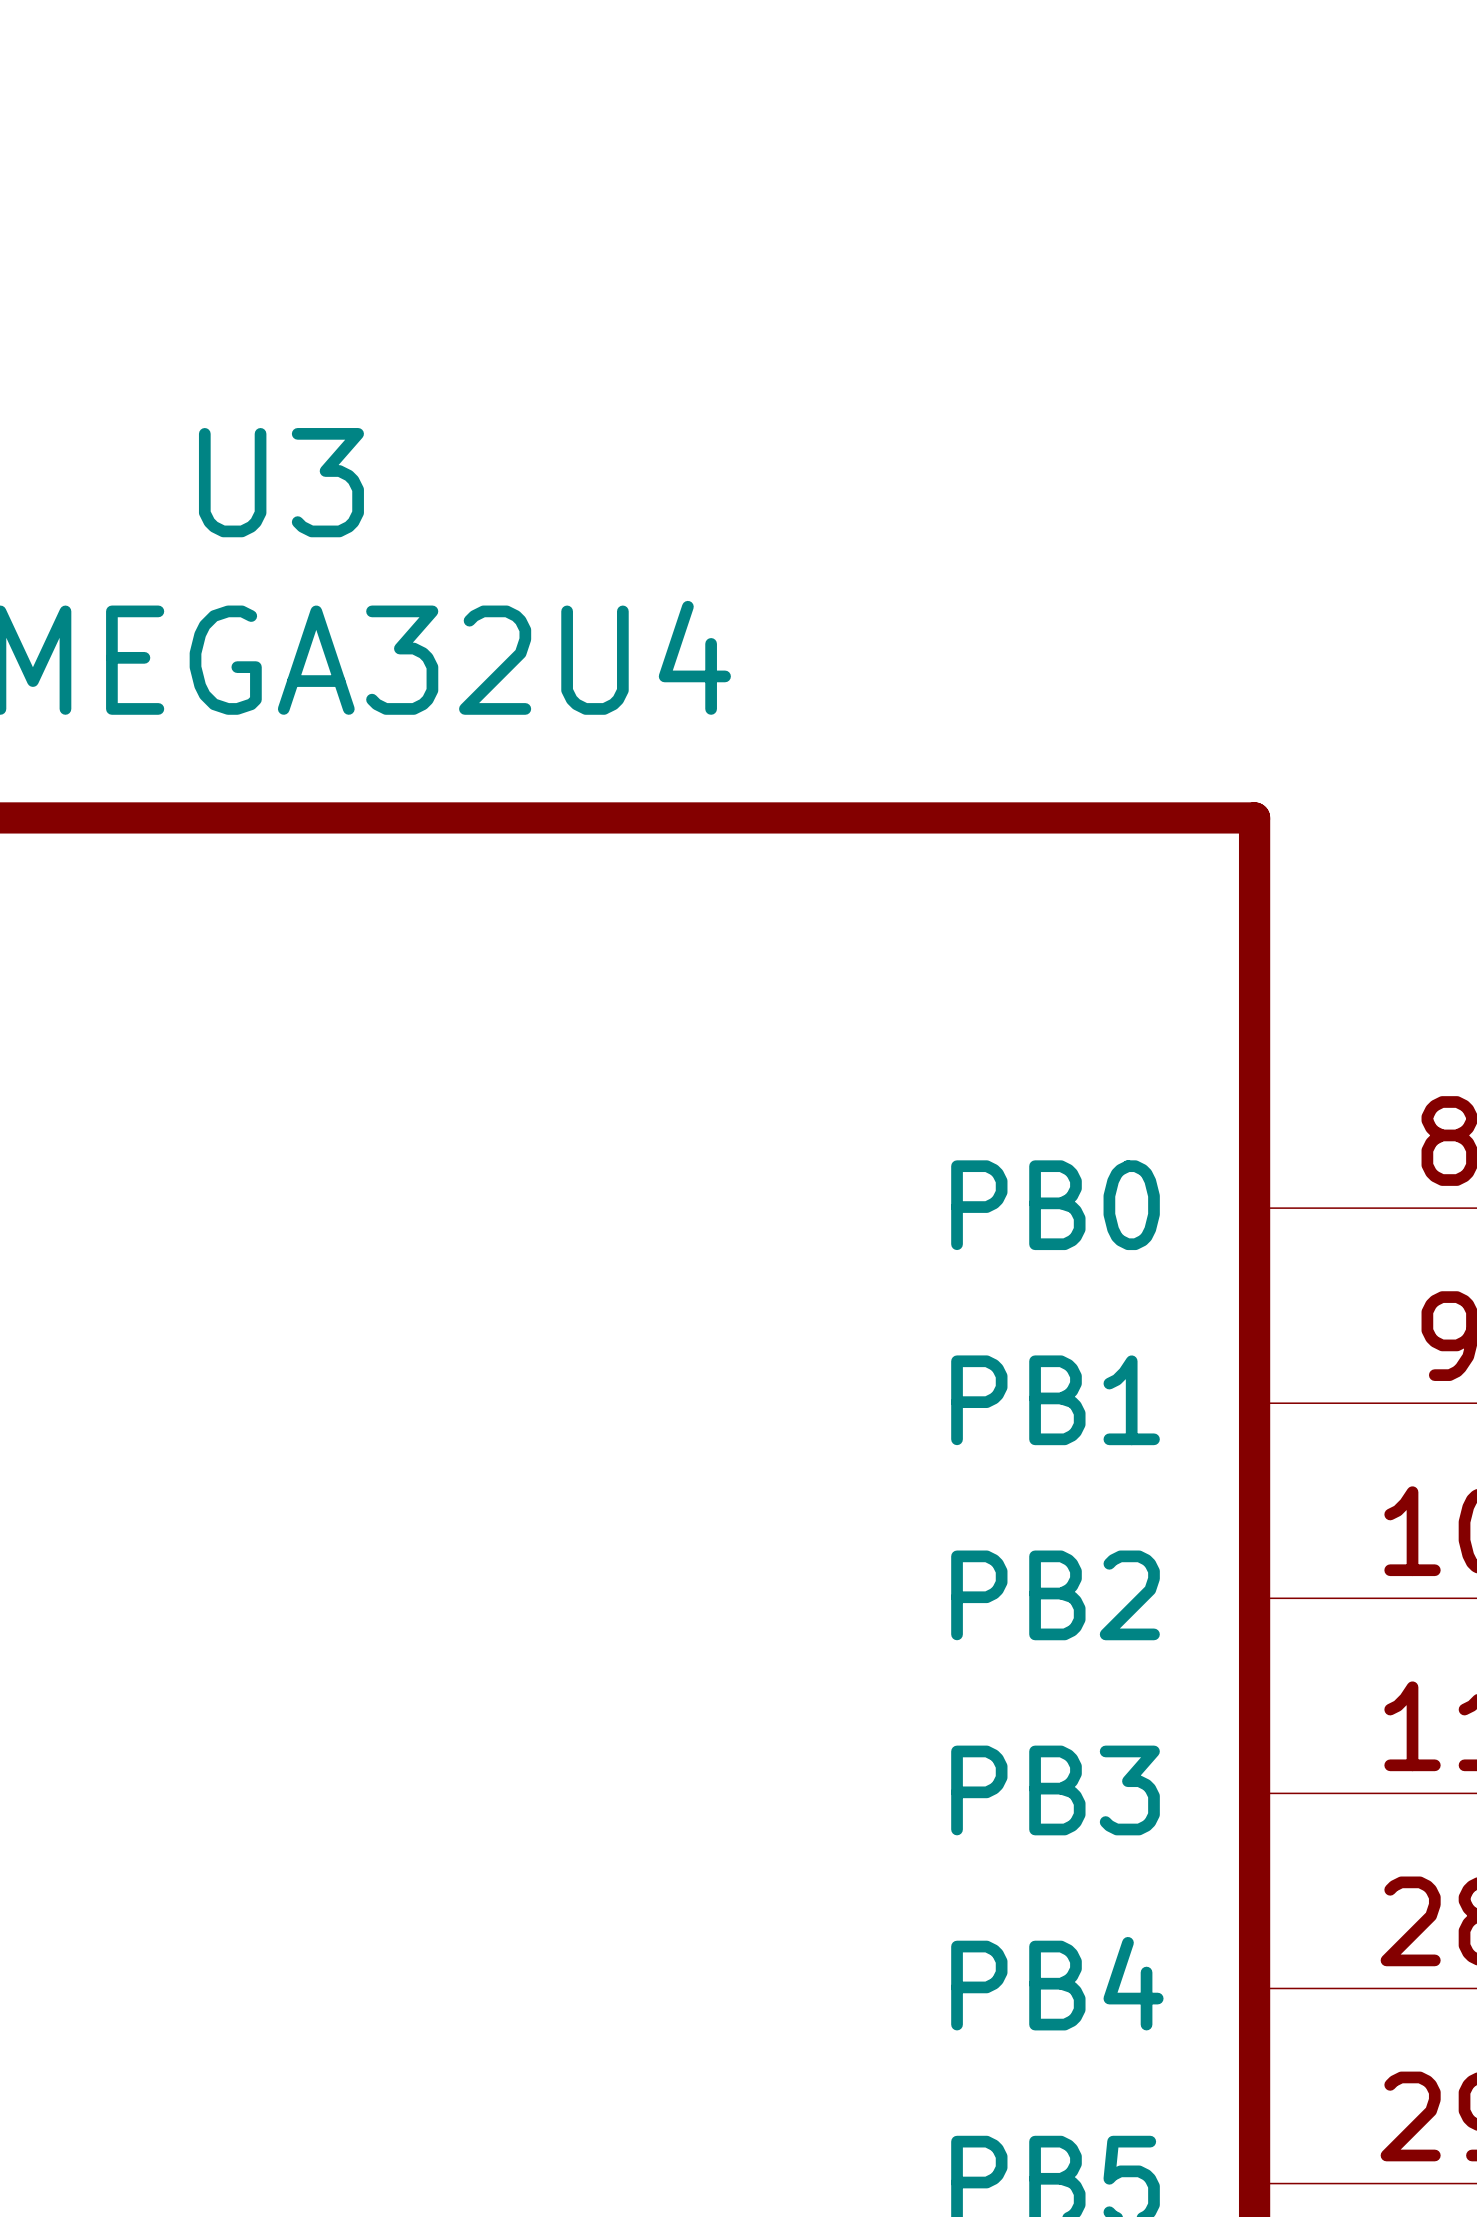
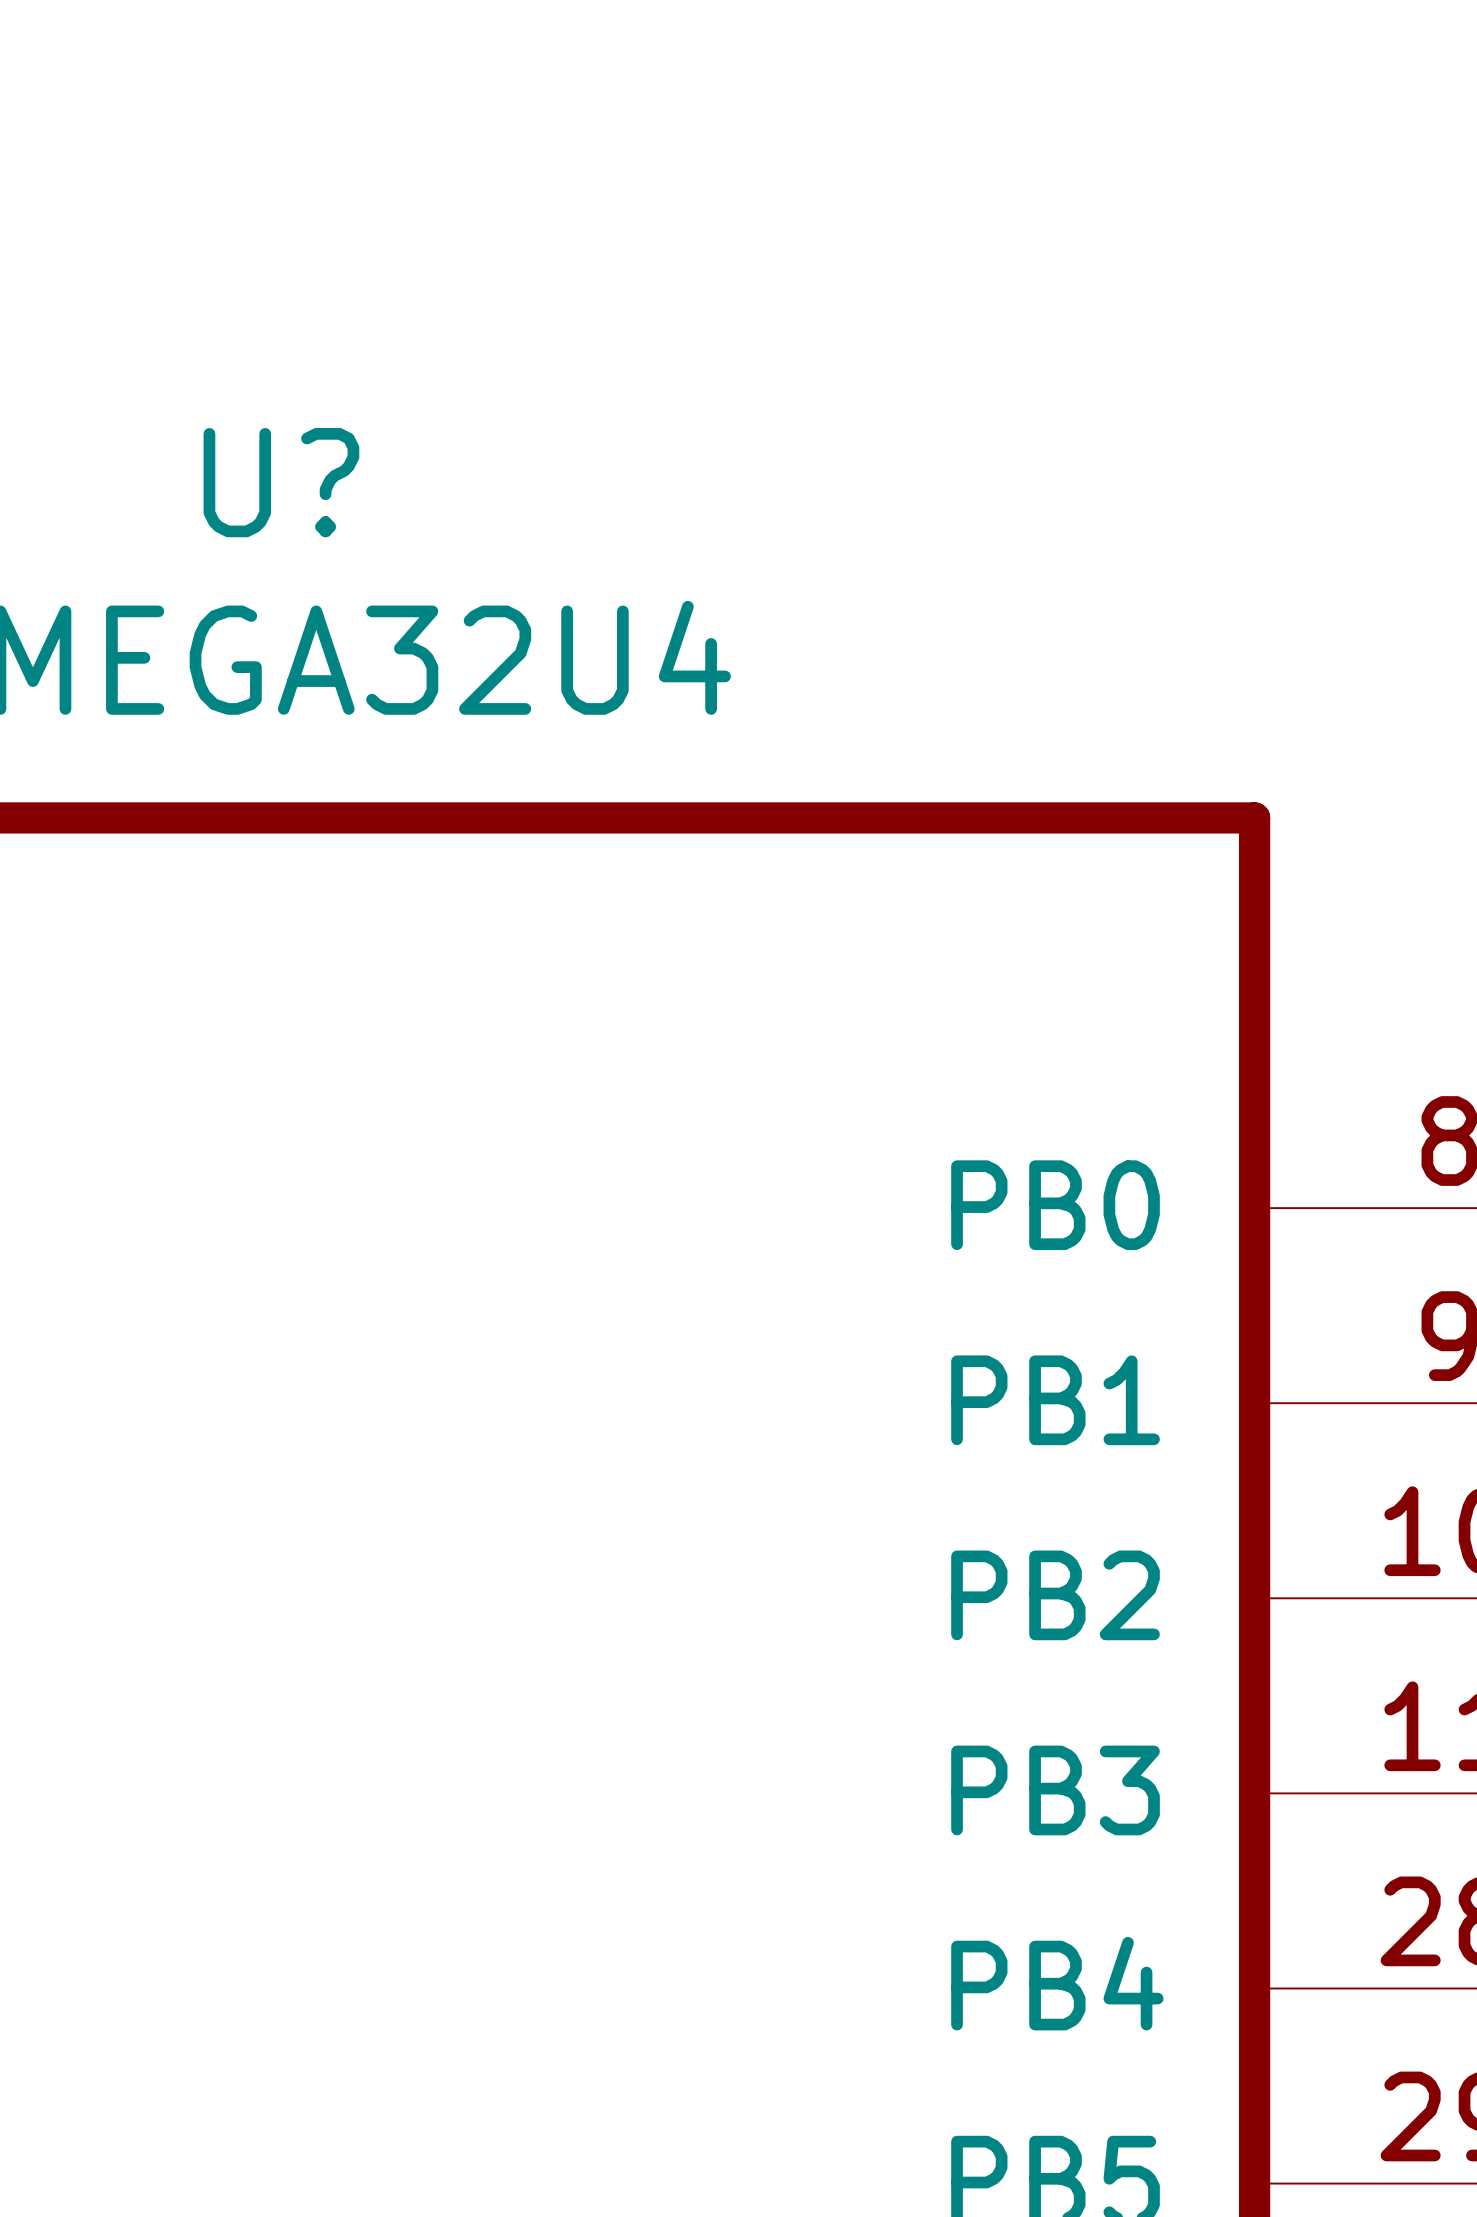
U3 name: U3 (281, 482) -> U? (281, 482)

